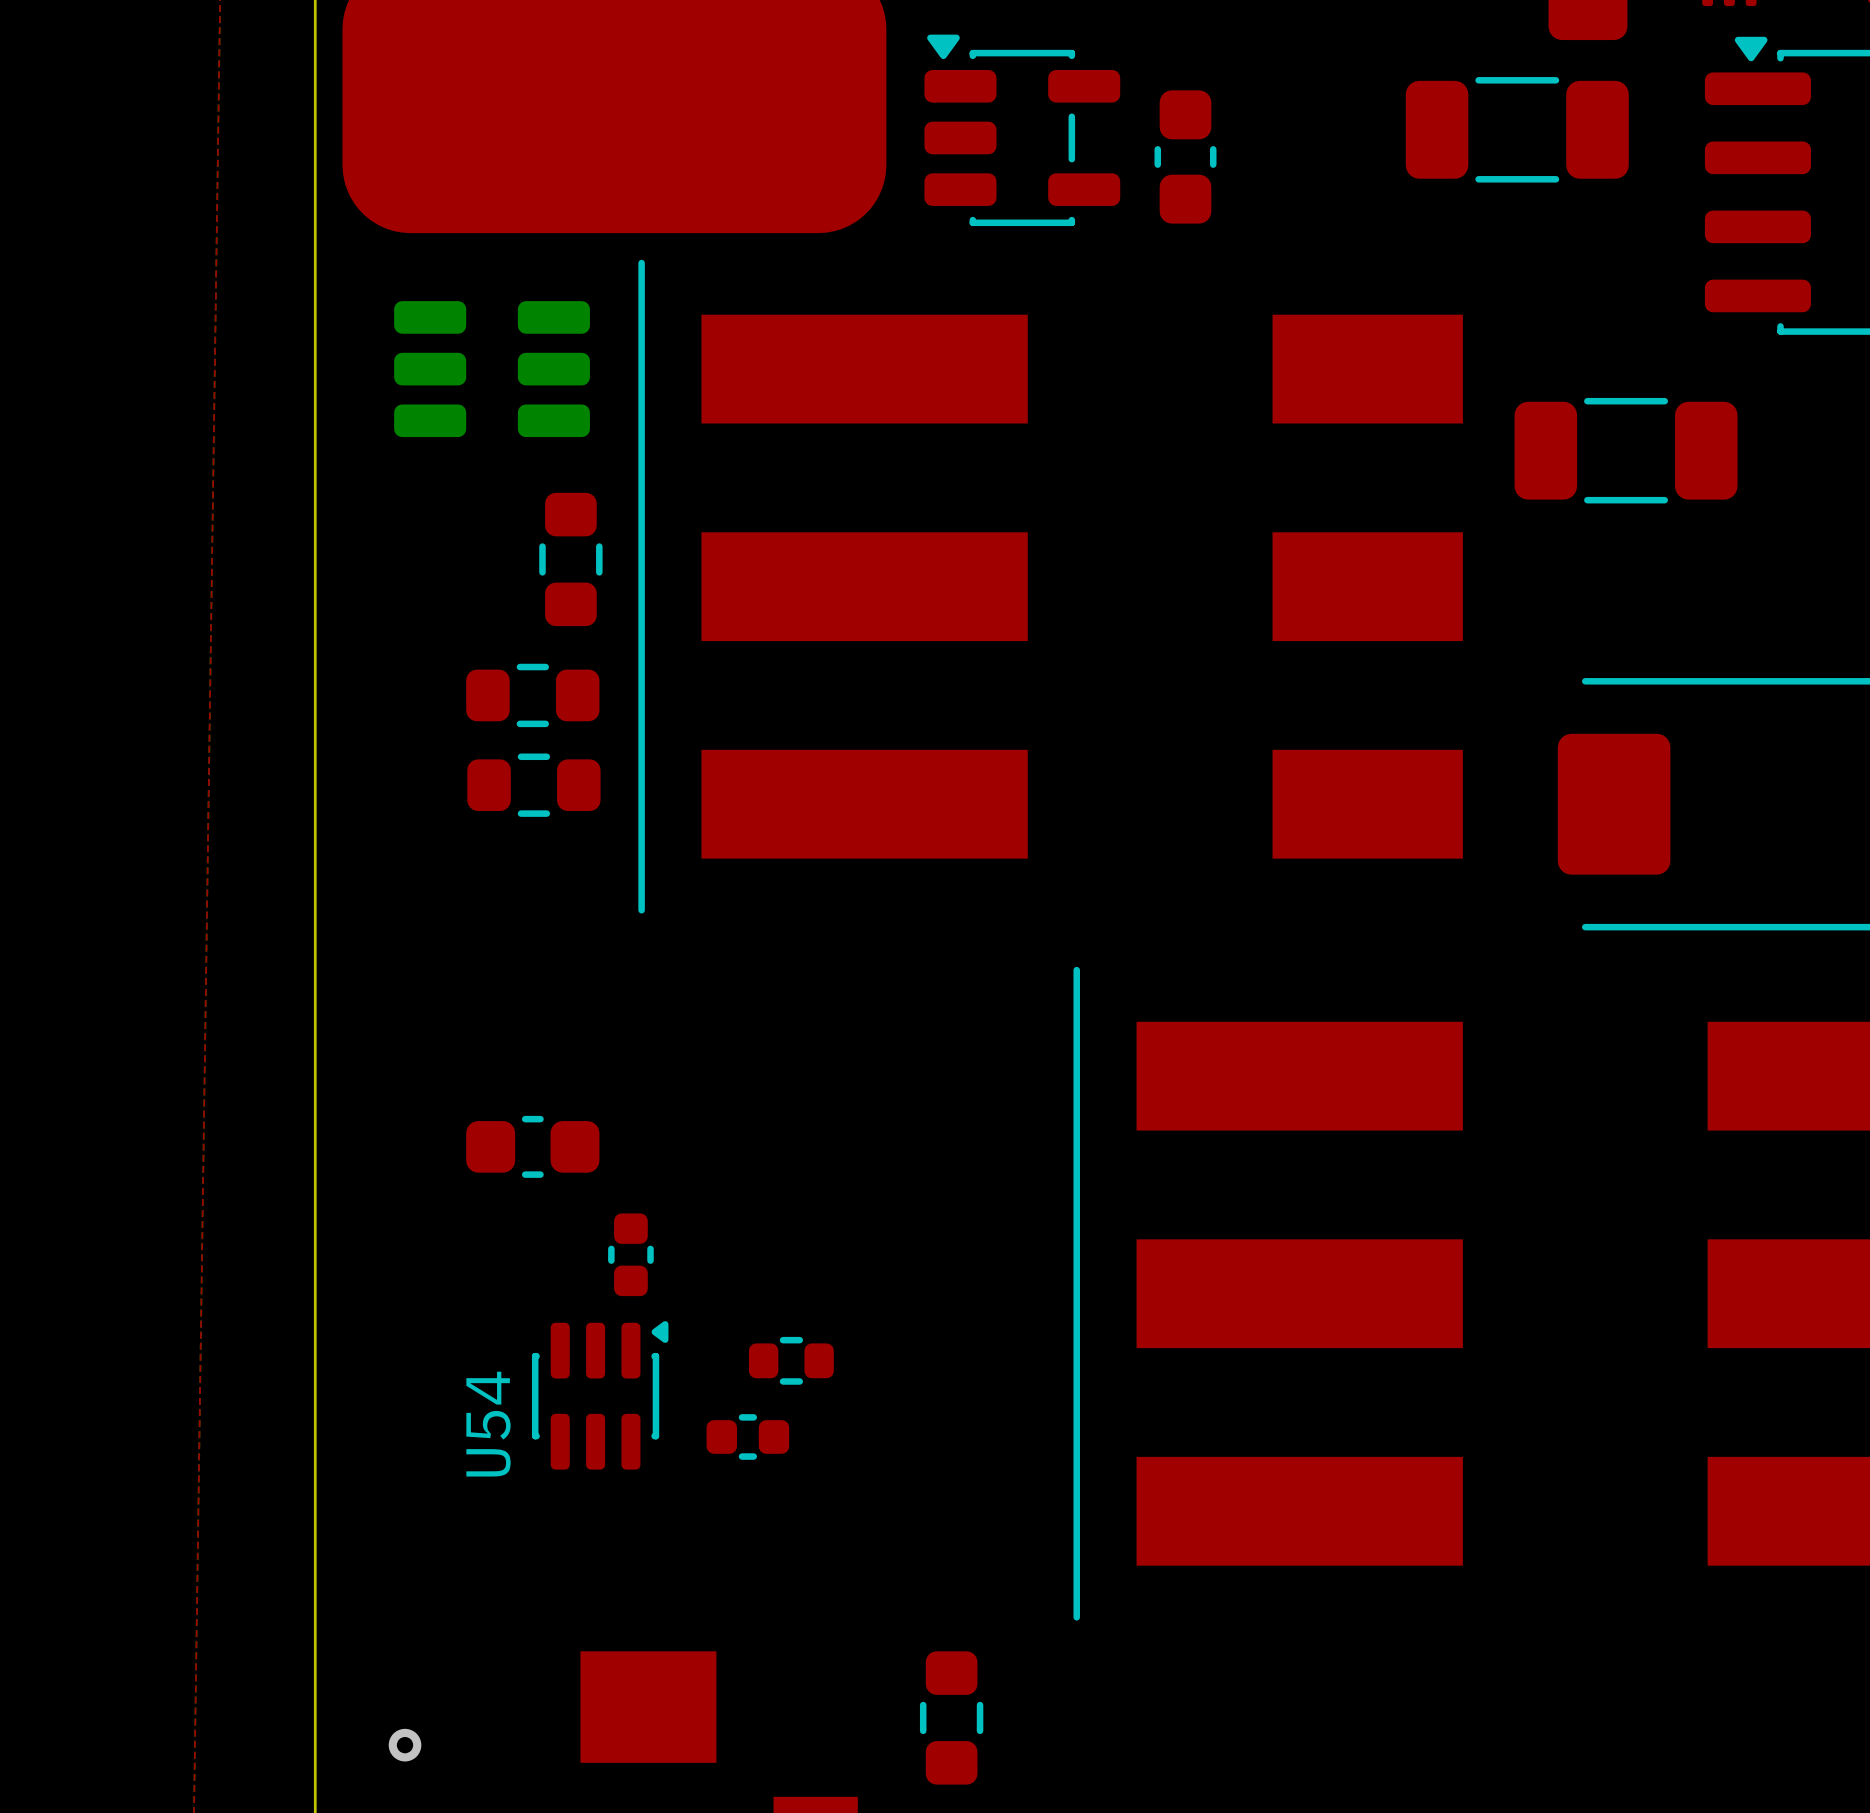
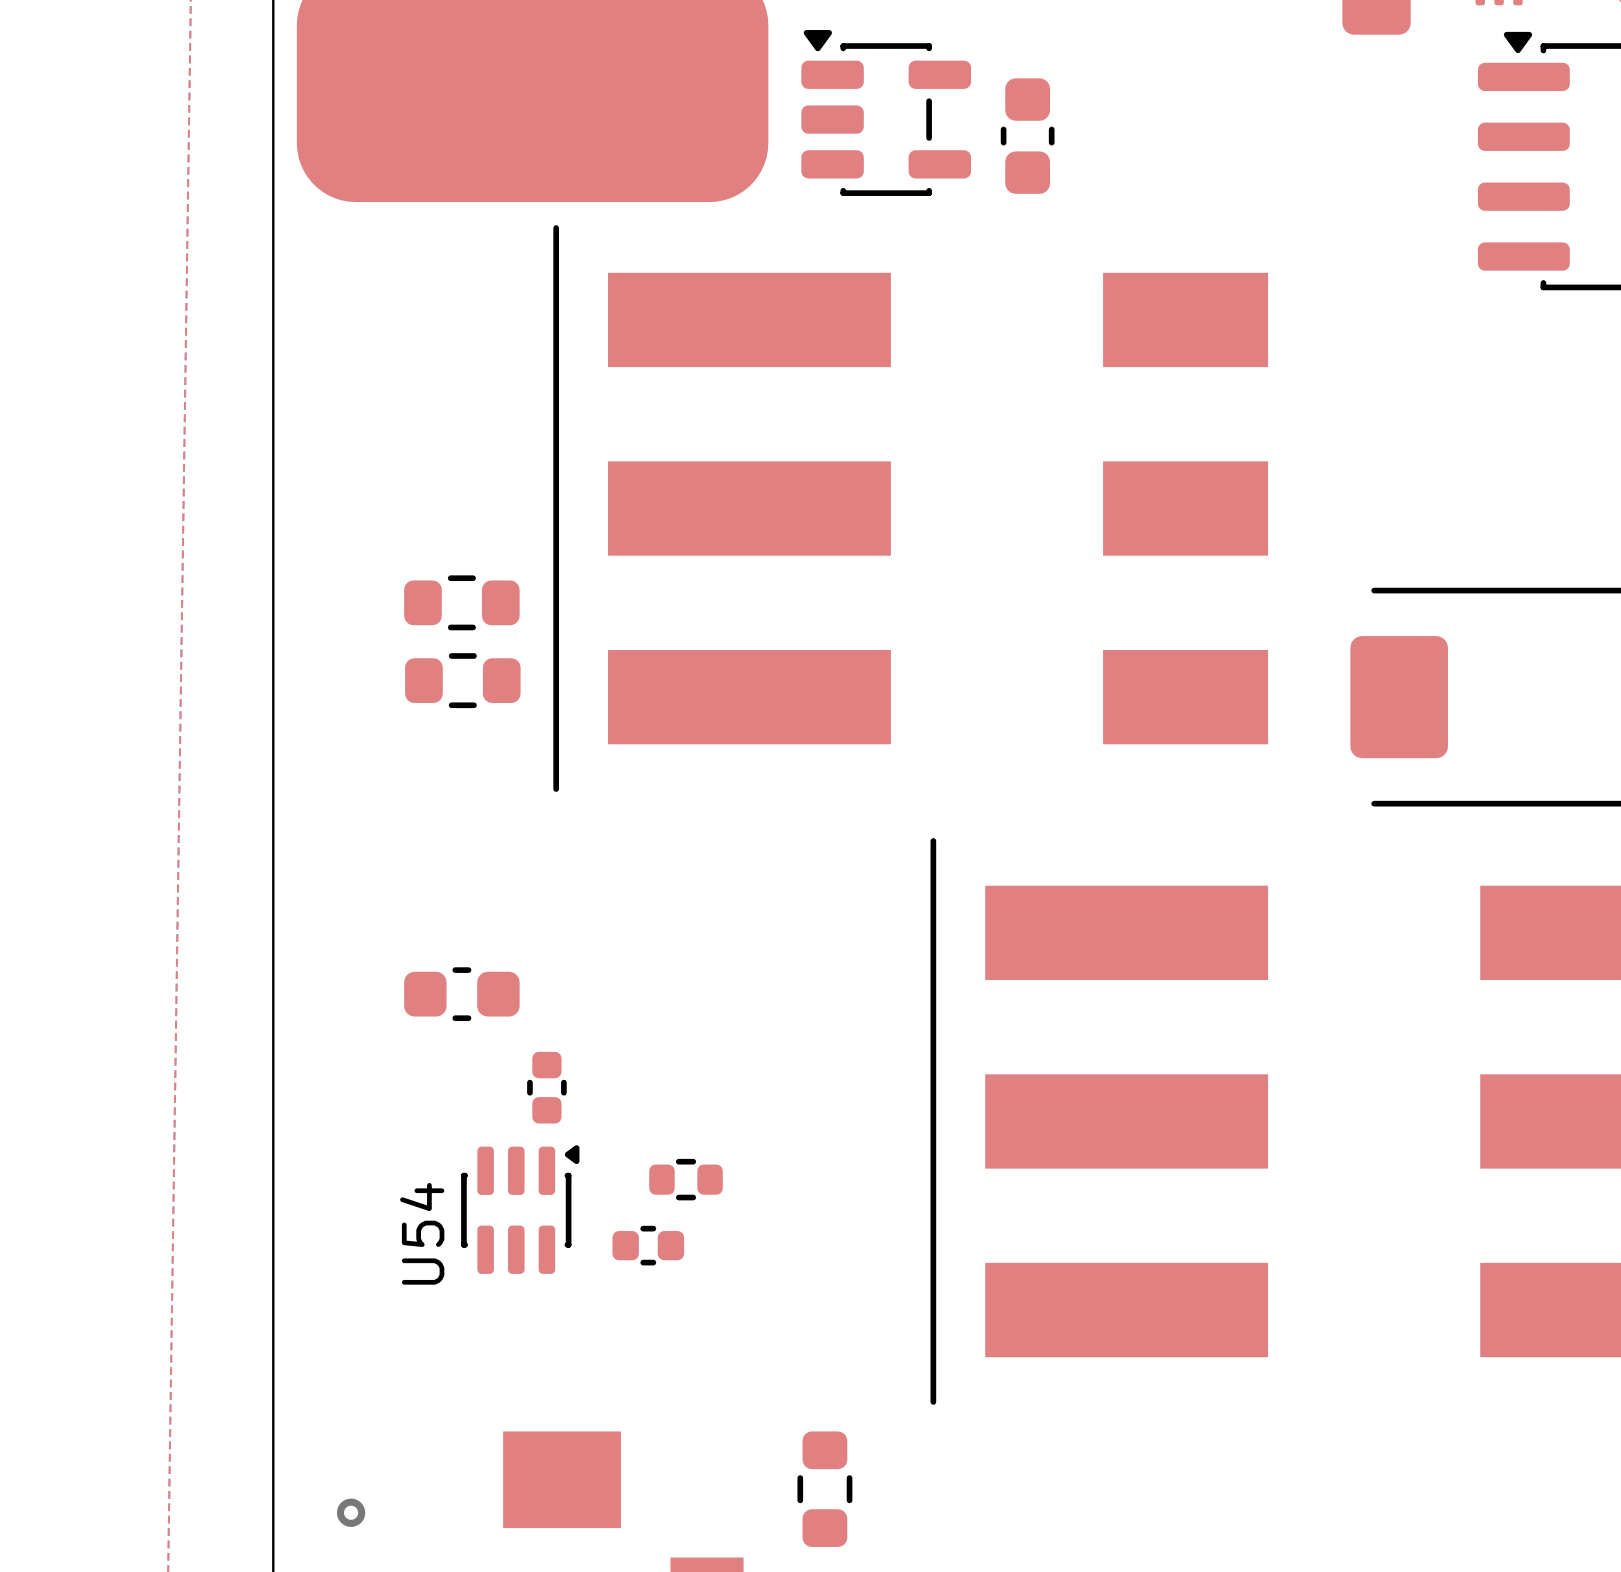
part: (1517, 129) -> none
part: (492, 369) -> none
part: (1626, 450) -> none
part: (570, 559) -> none

